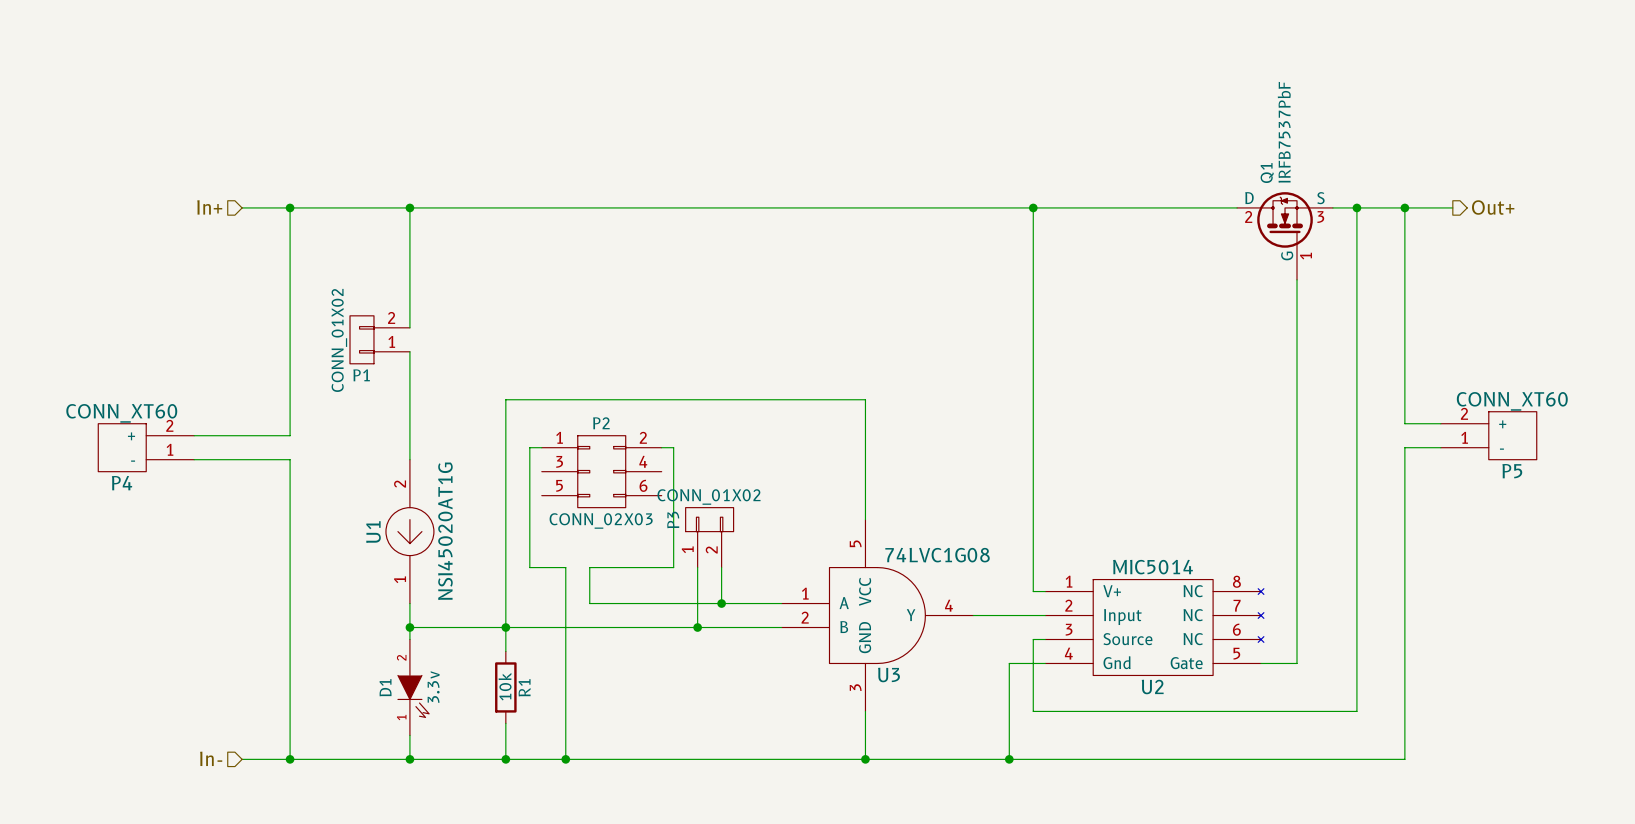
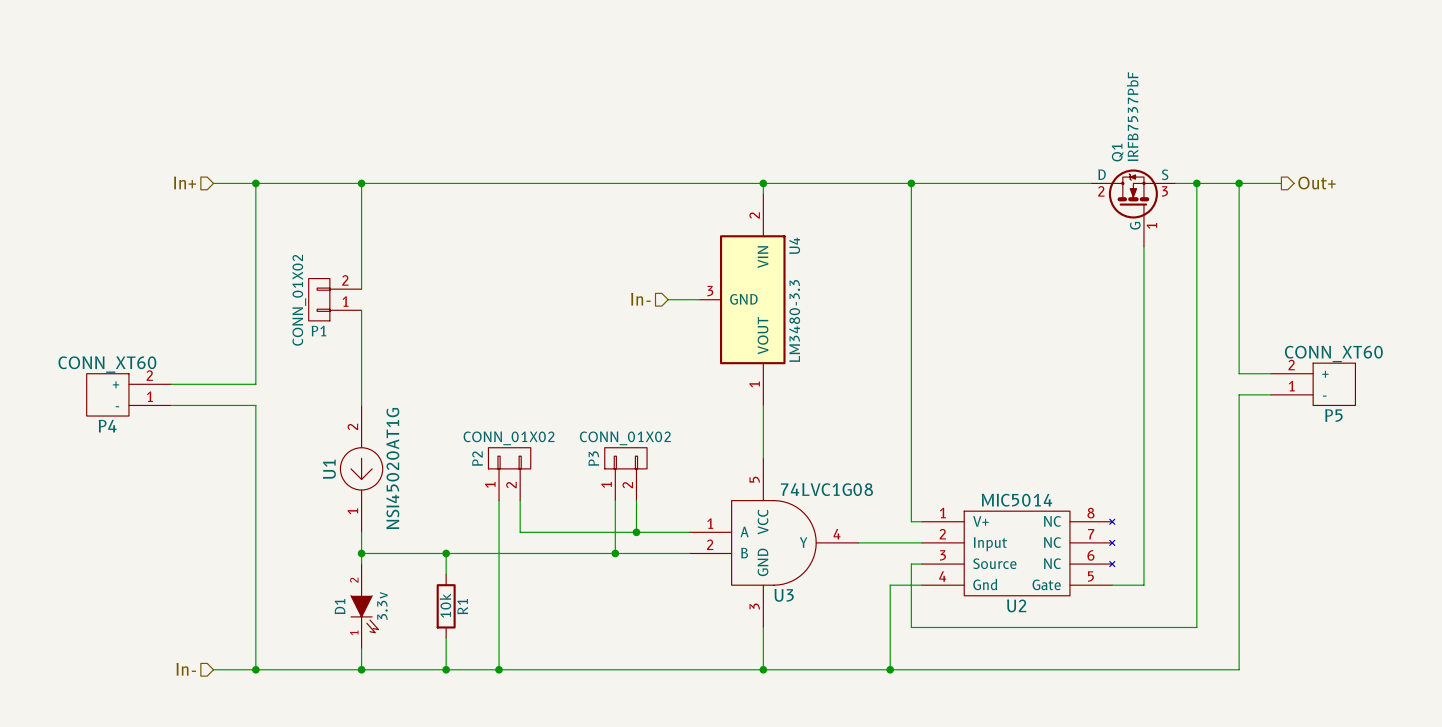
wire: none -> (763, 183) (763, 193)
junction: none -> (763, 183)
hierarchical label: none -> In- (640, 299)
wire: none -> (668, 299) (699, 299)
U4: none -> LM3480-3.3 (742, 299)
P2 name position: P2 (601, 423) -> P2 (477, 458)
P2 symbol: [541, 435, 662, 508] -> [488, 447, 531, 501]
wire: (541, 447) (529, 447) (529, 567) (565, 567) -> none
wire: (661, 447) (673, 447) (673, 567) (589, 567) -> none
wire: (865, 459) (865, 399) (505, 399) (505, 627) -> none
P2 value: CONN_02X03 (601, 520) -> CONN_01X02 (509, 438)

